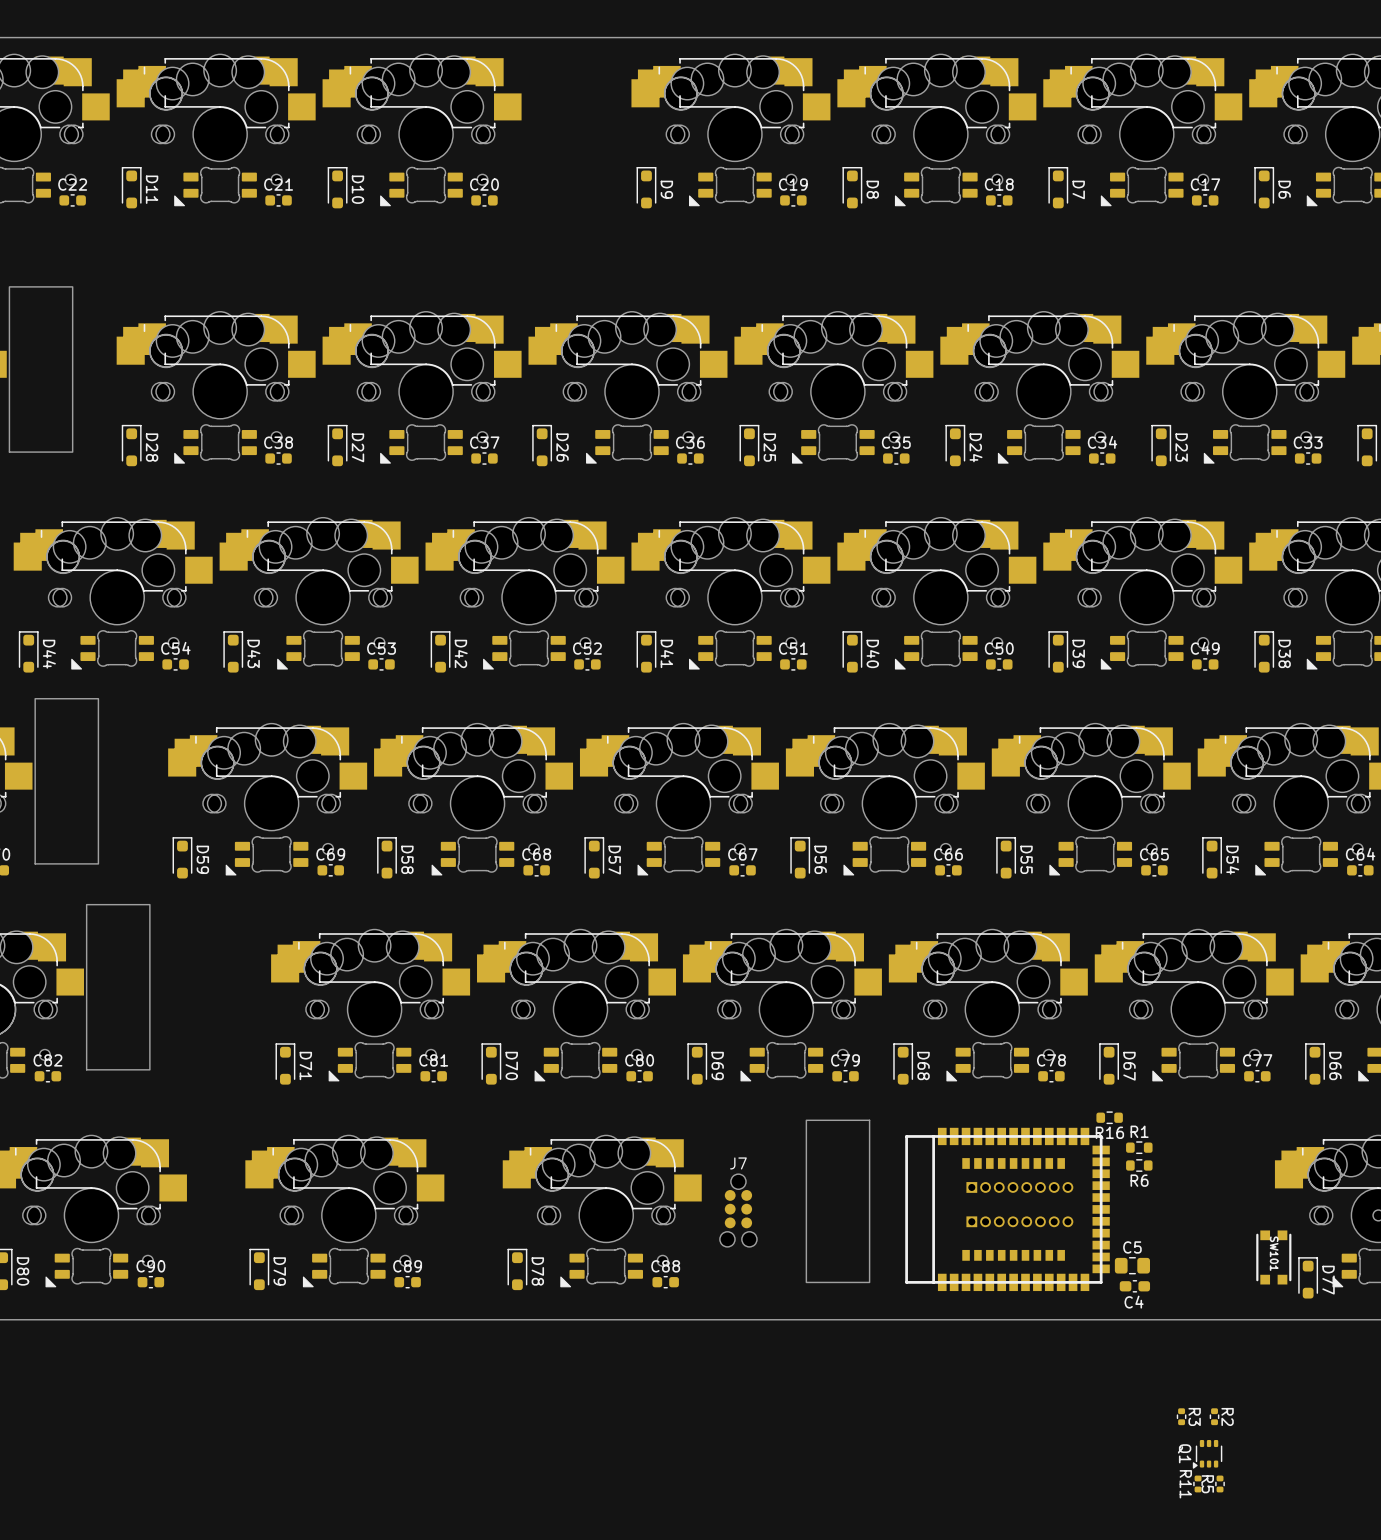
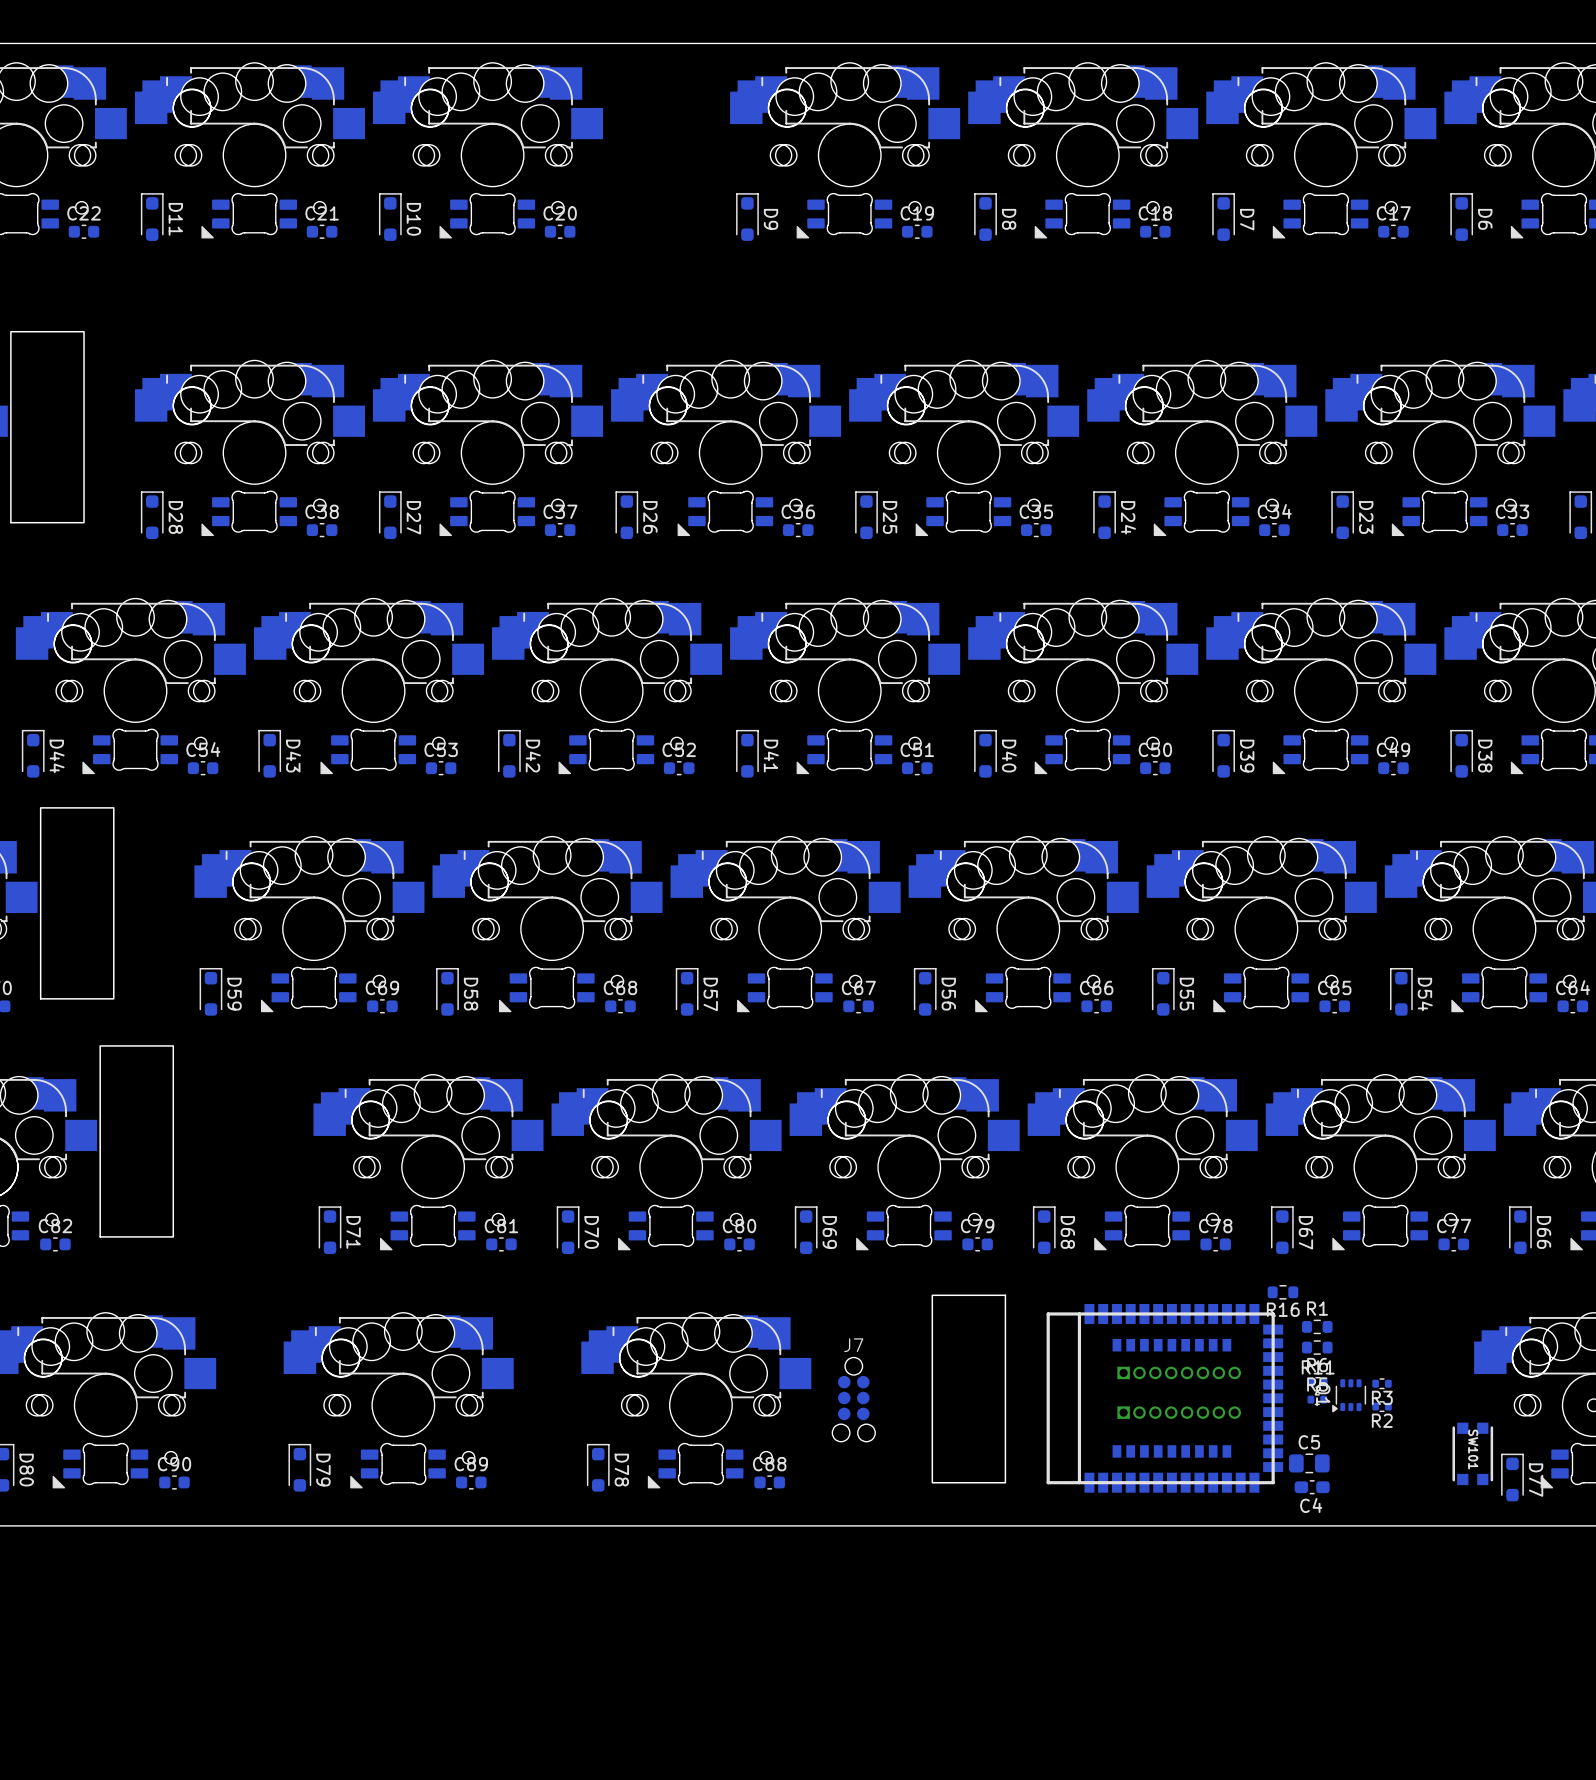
R3 rotation: 0° (1181, 1416) -> 90° clockwise (1382, 1383)
R3 position: (1181, 1416) -> (1382, 1383)
R2 rotation: 0° (1214, 1416) -> 90° clockwise (1382, 1406)
R2 position: (1214, 1416) -> (1382, 1406)
Q1 position: (1207, 1454) -> (1349, 1395)
R11 rotation: 0° (1198, 1483) -> 90° clockwise (1317, 1382)
R11 position: (1198, 1483) -> (1317, 1382)
R5 rotation: 0° (1220, 1483) -> 90° clockwise (1317, 1399)
R5 position: (1220, 1483) -> (1317, 1399)

